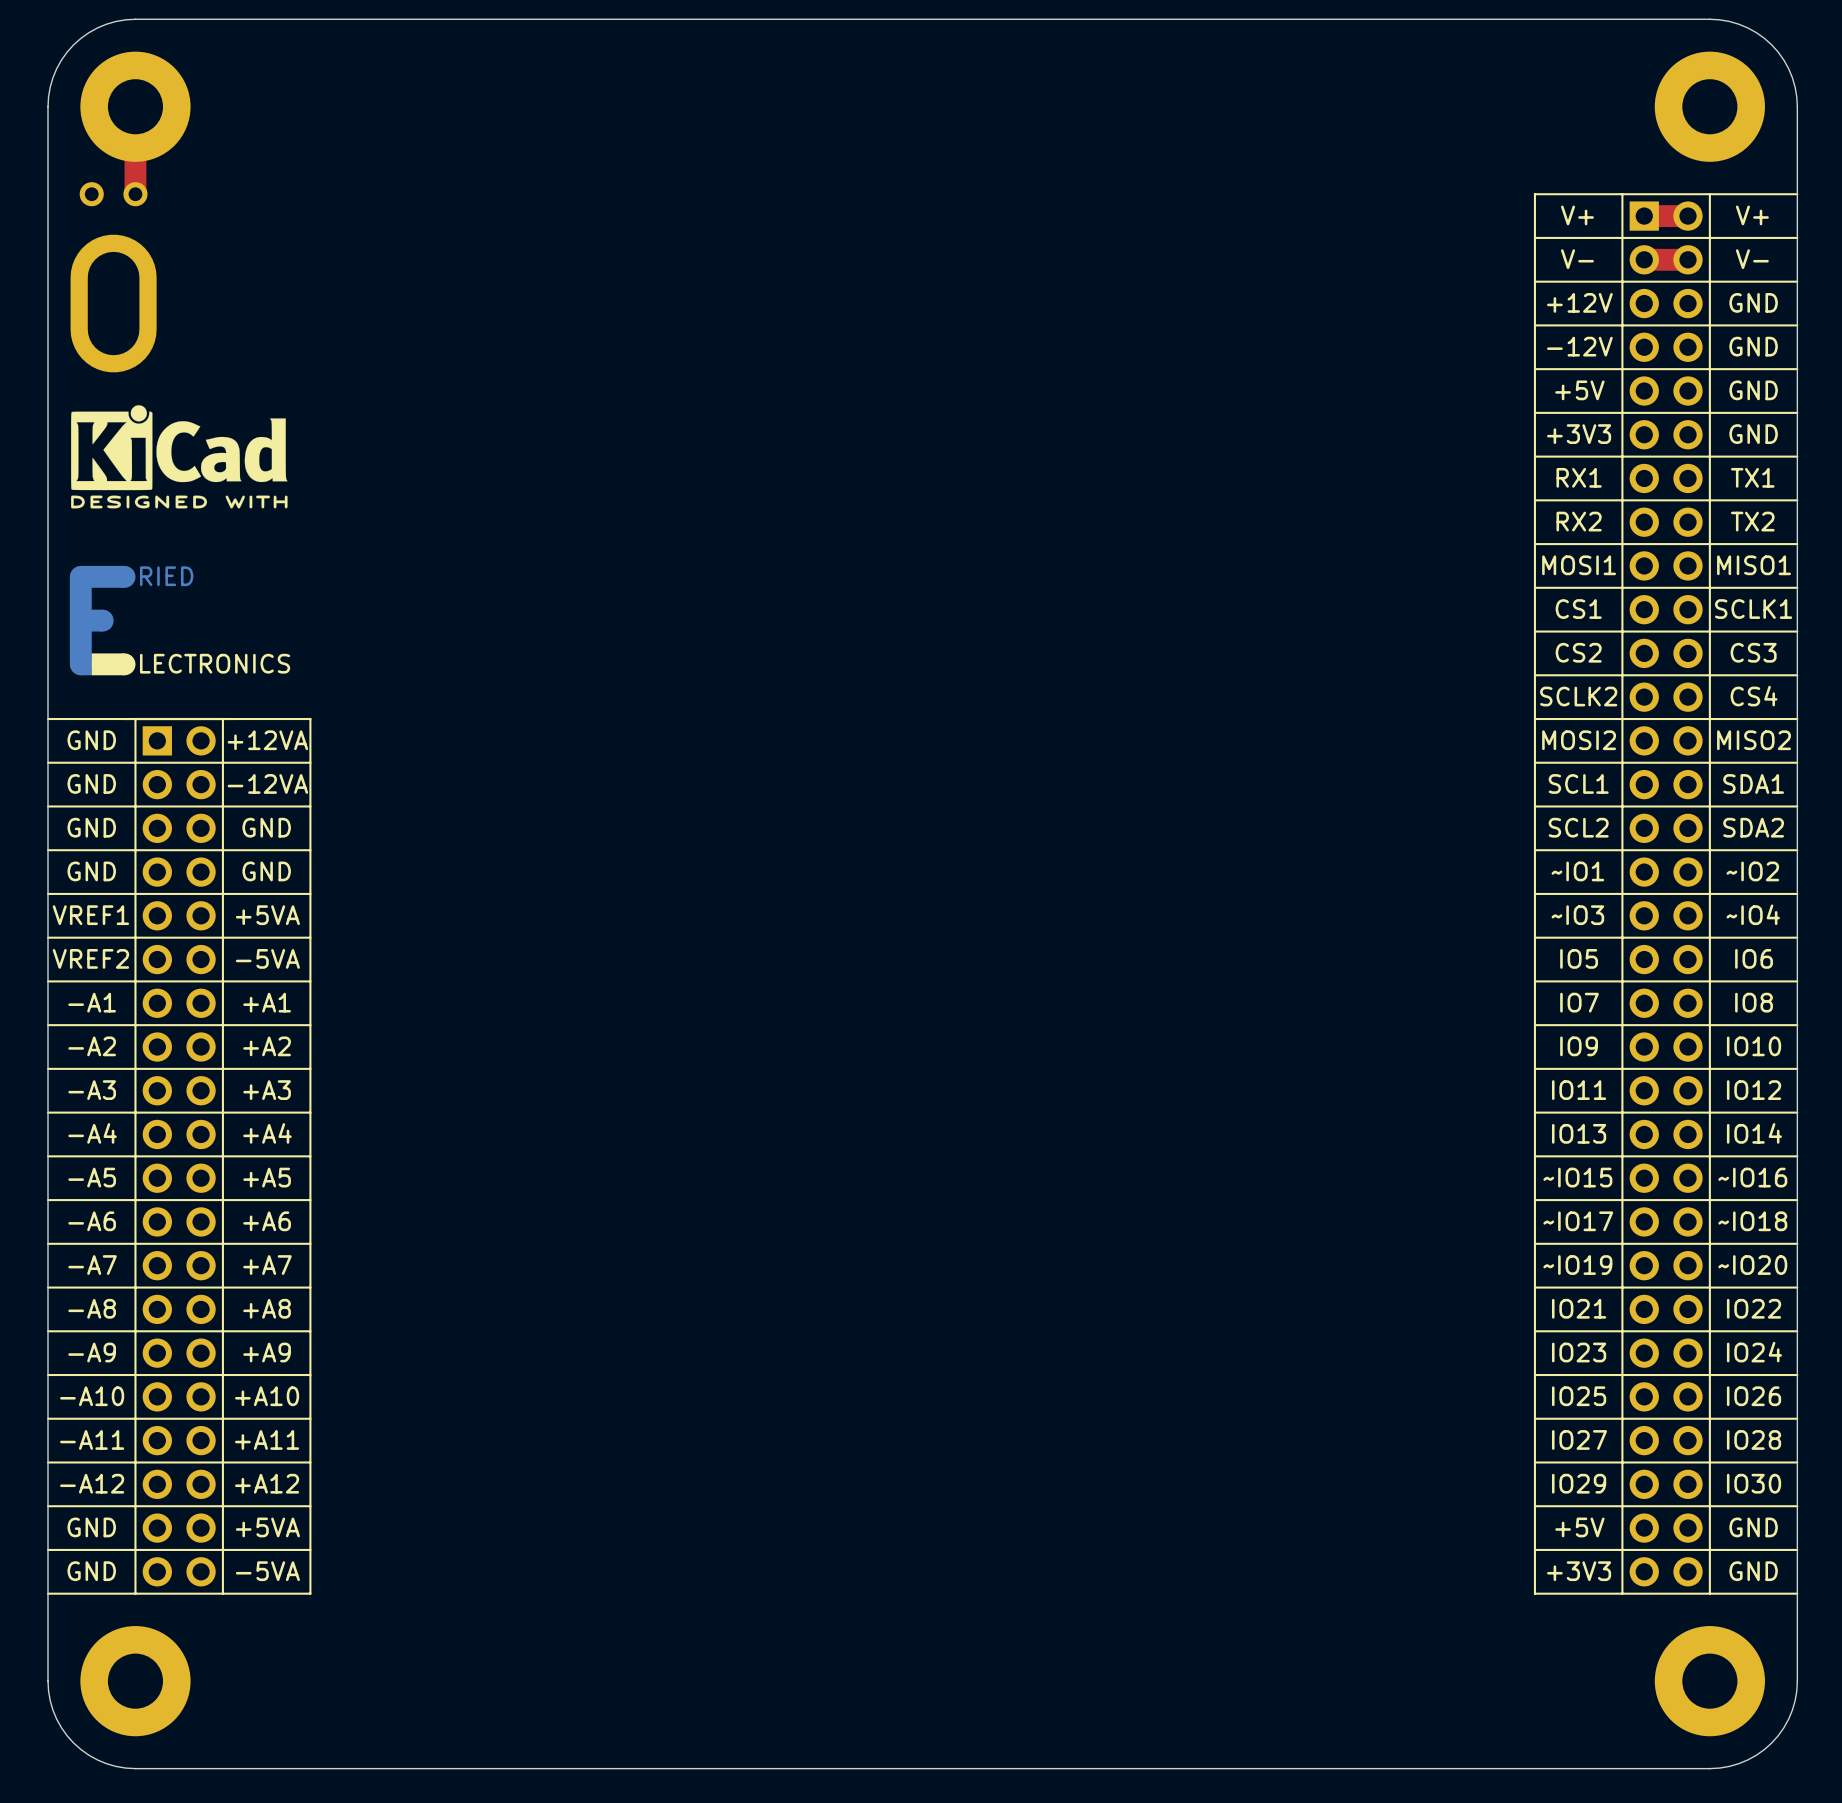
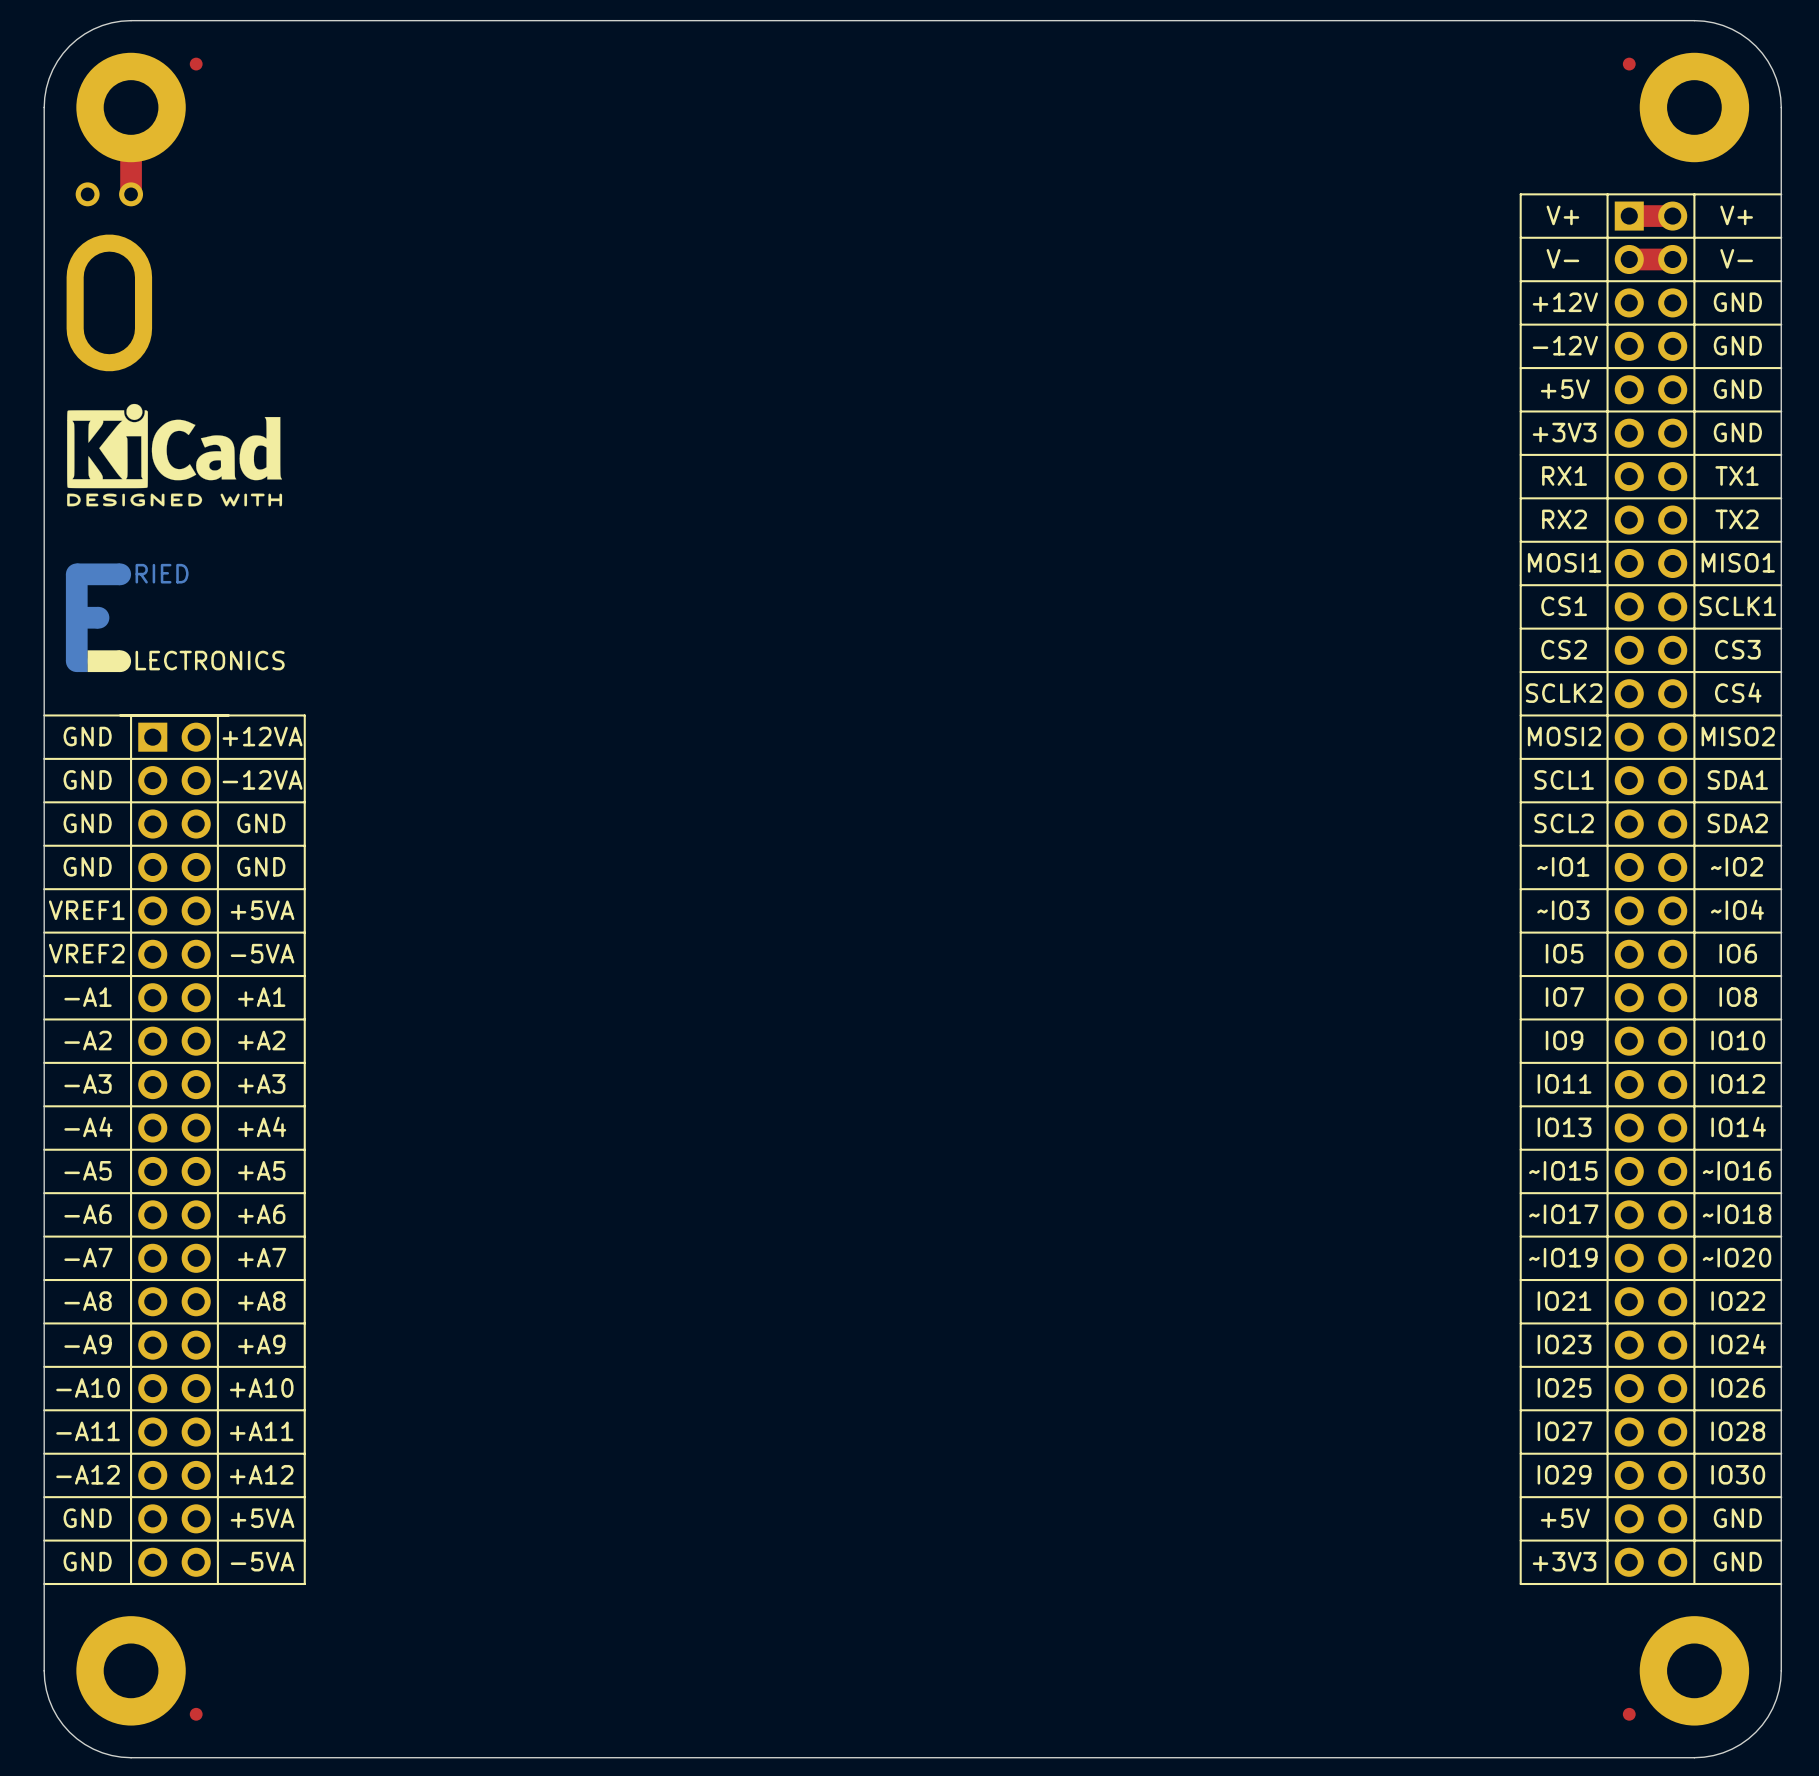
part: none -> (196, 64)
part: none -> (1629, 64)
part: none -> (196, 1714)
part: none -> (1629, 1714)

